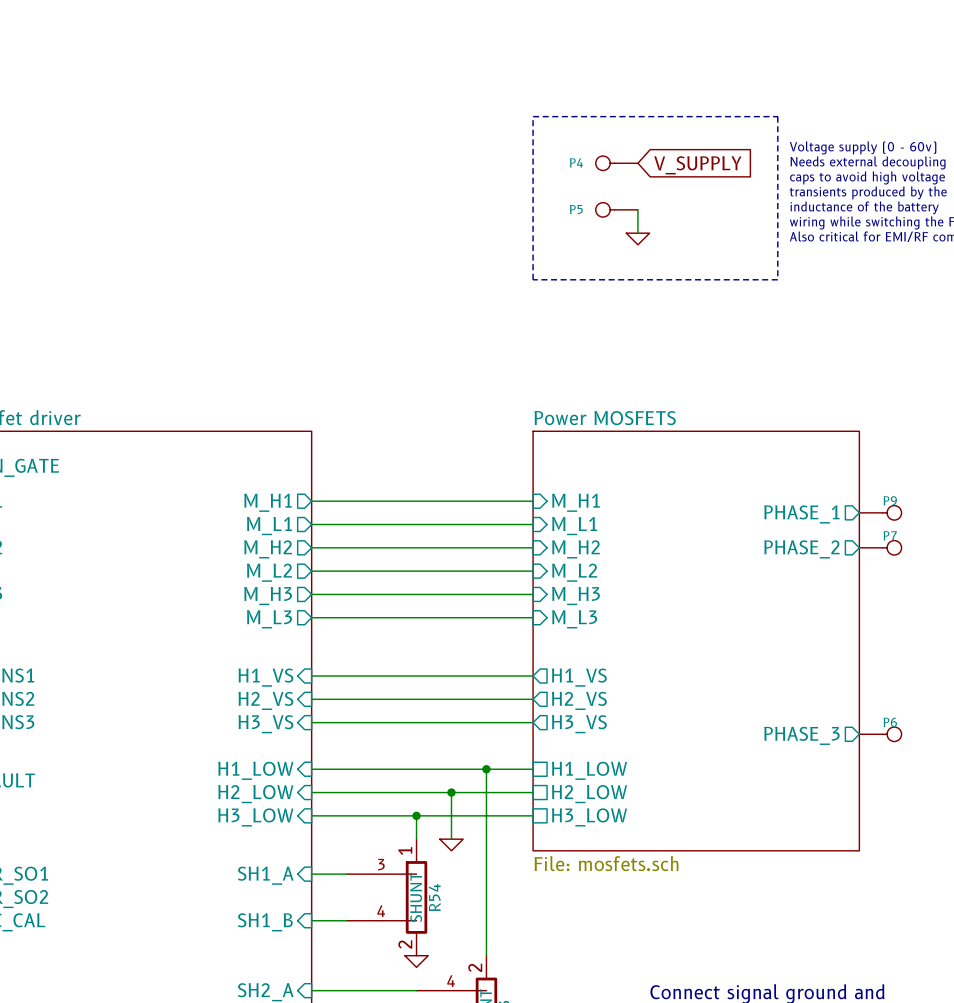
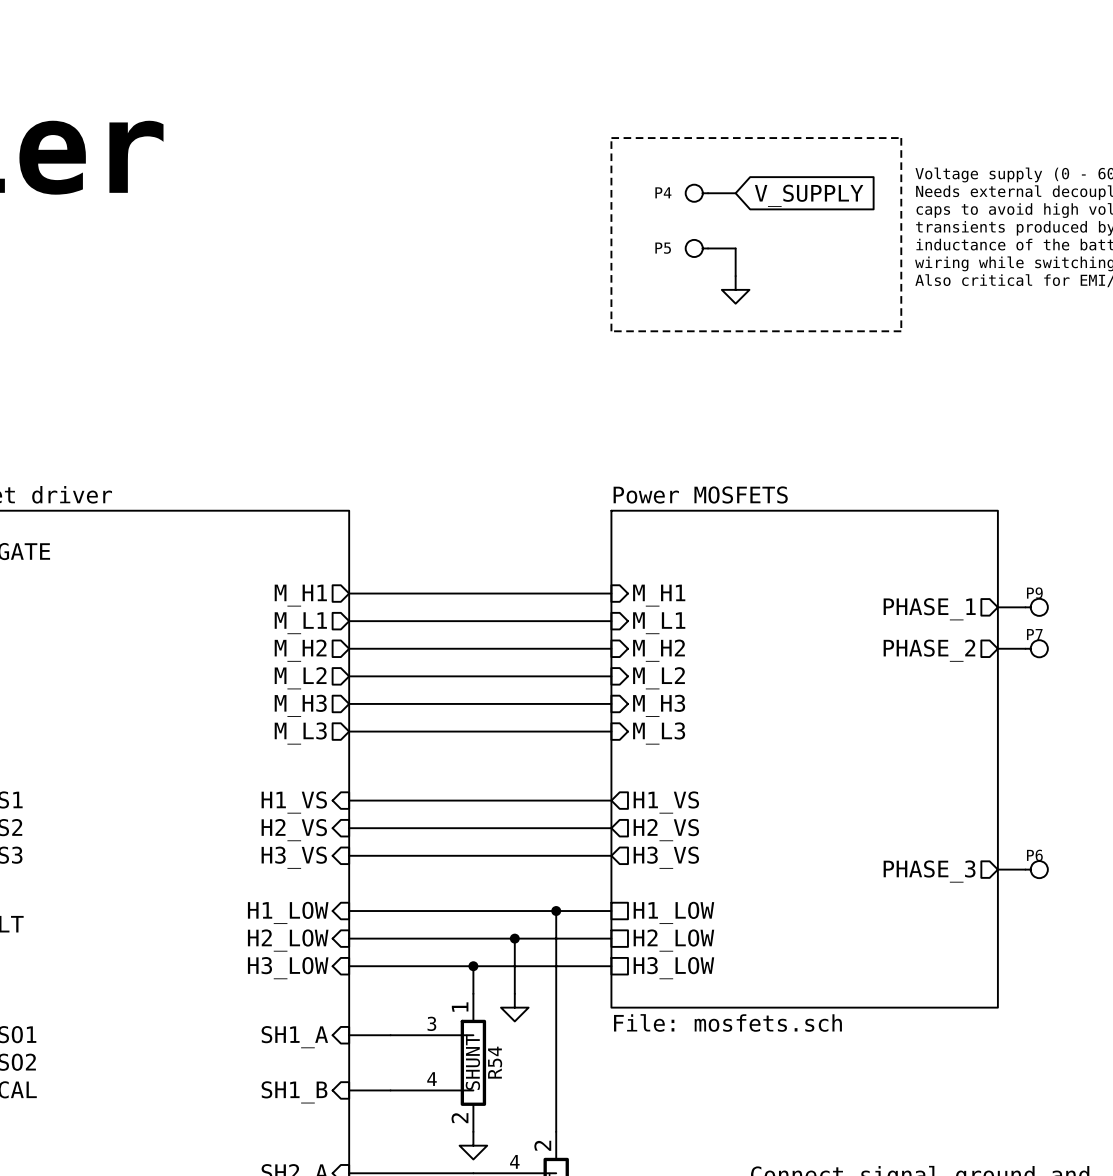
power symbol shape: [626, 233, 650, 245] -> [721, 276, 750, 304]
power symbol shape: [439, 839, 464, 851] -> [501, 993, 529, 1022]
power symbol shape: [404, 955, 429, 968] -> [459, 1131, 488, 1160]

